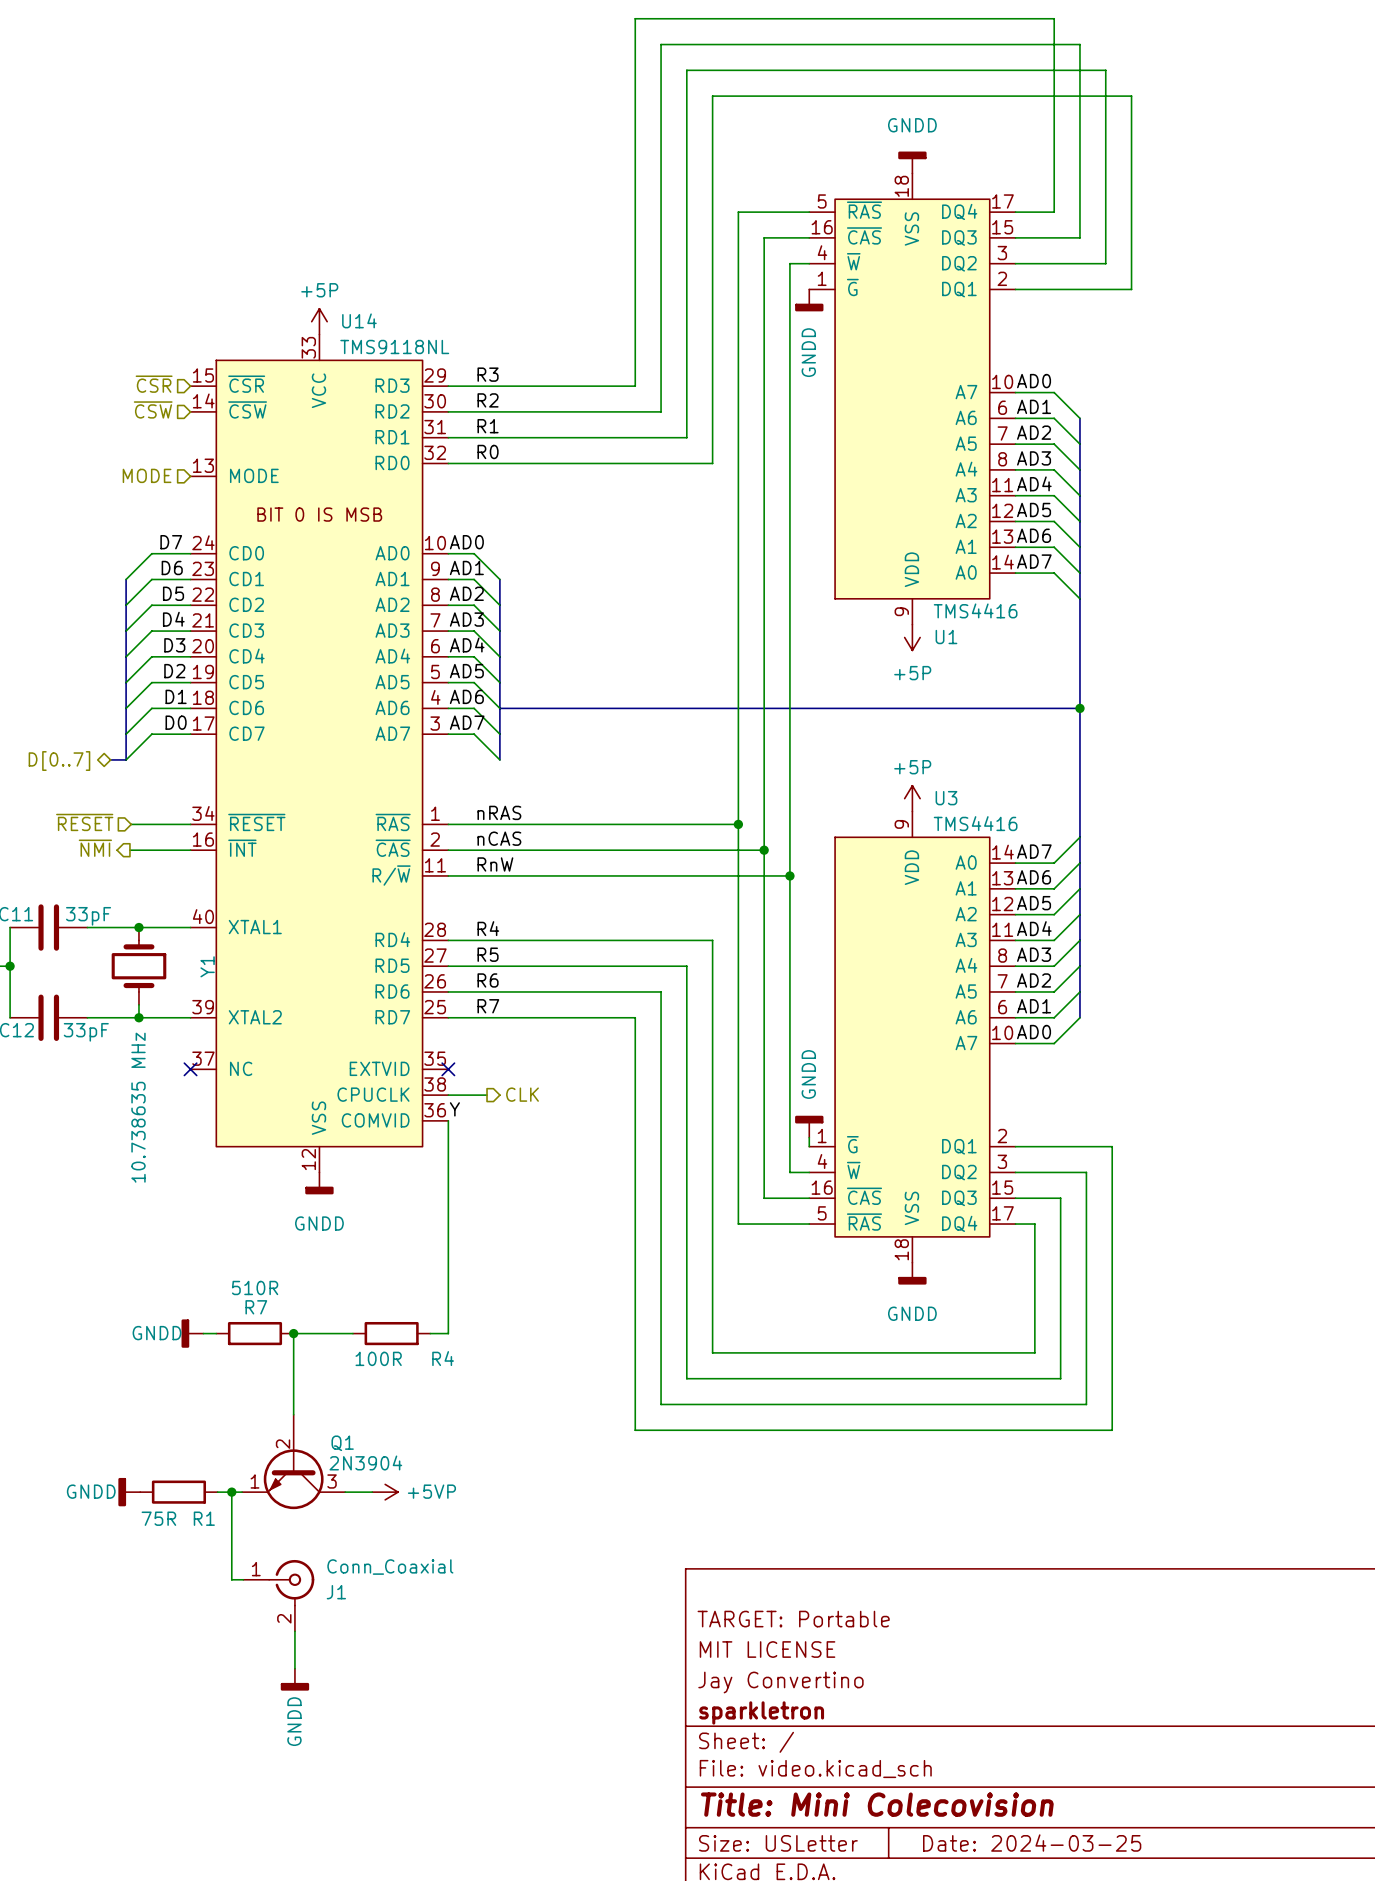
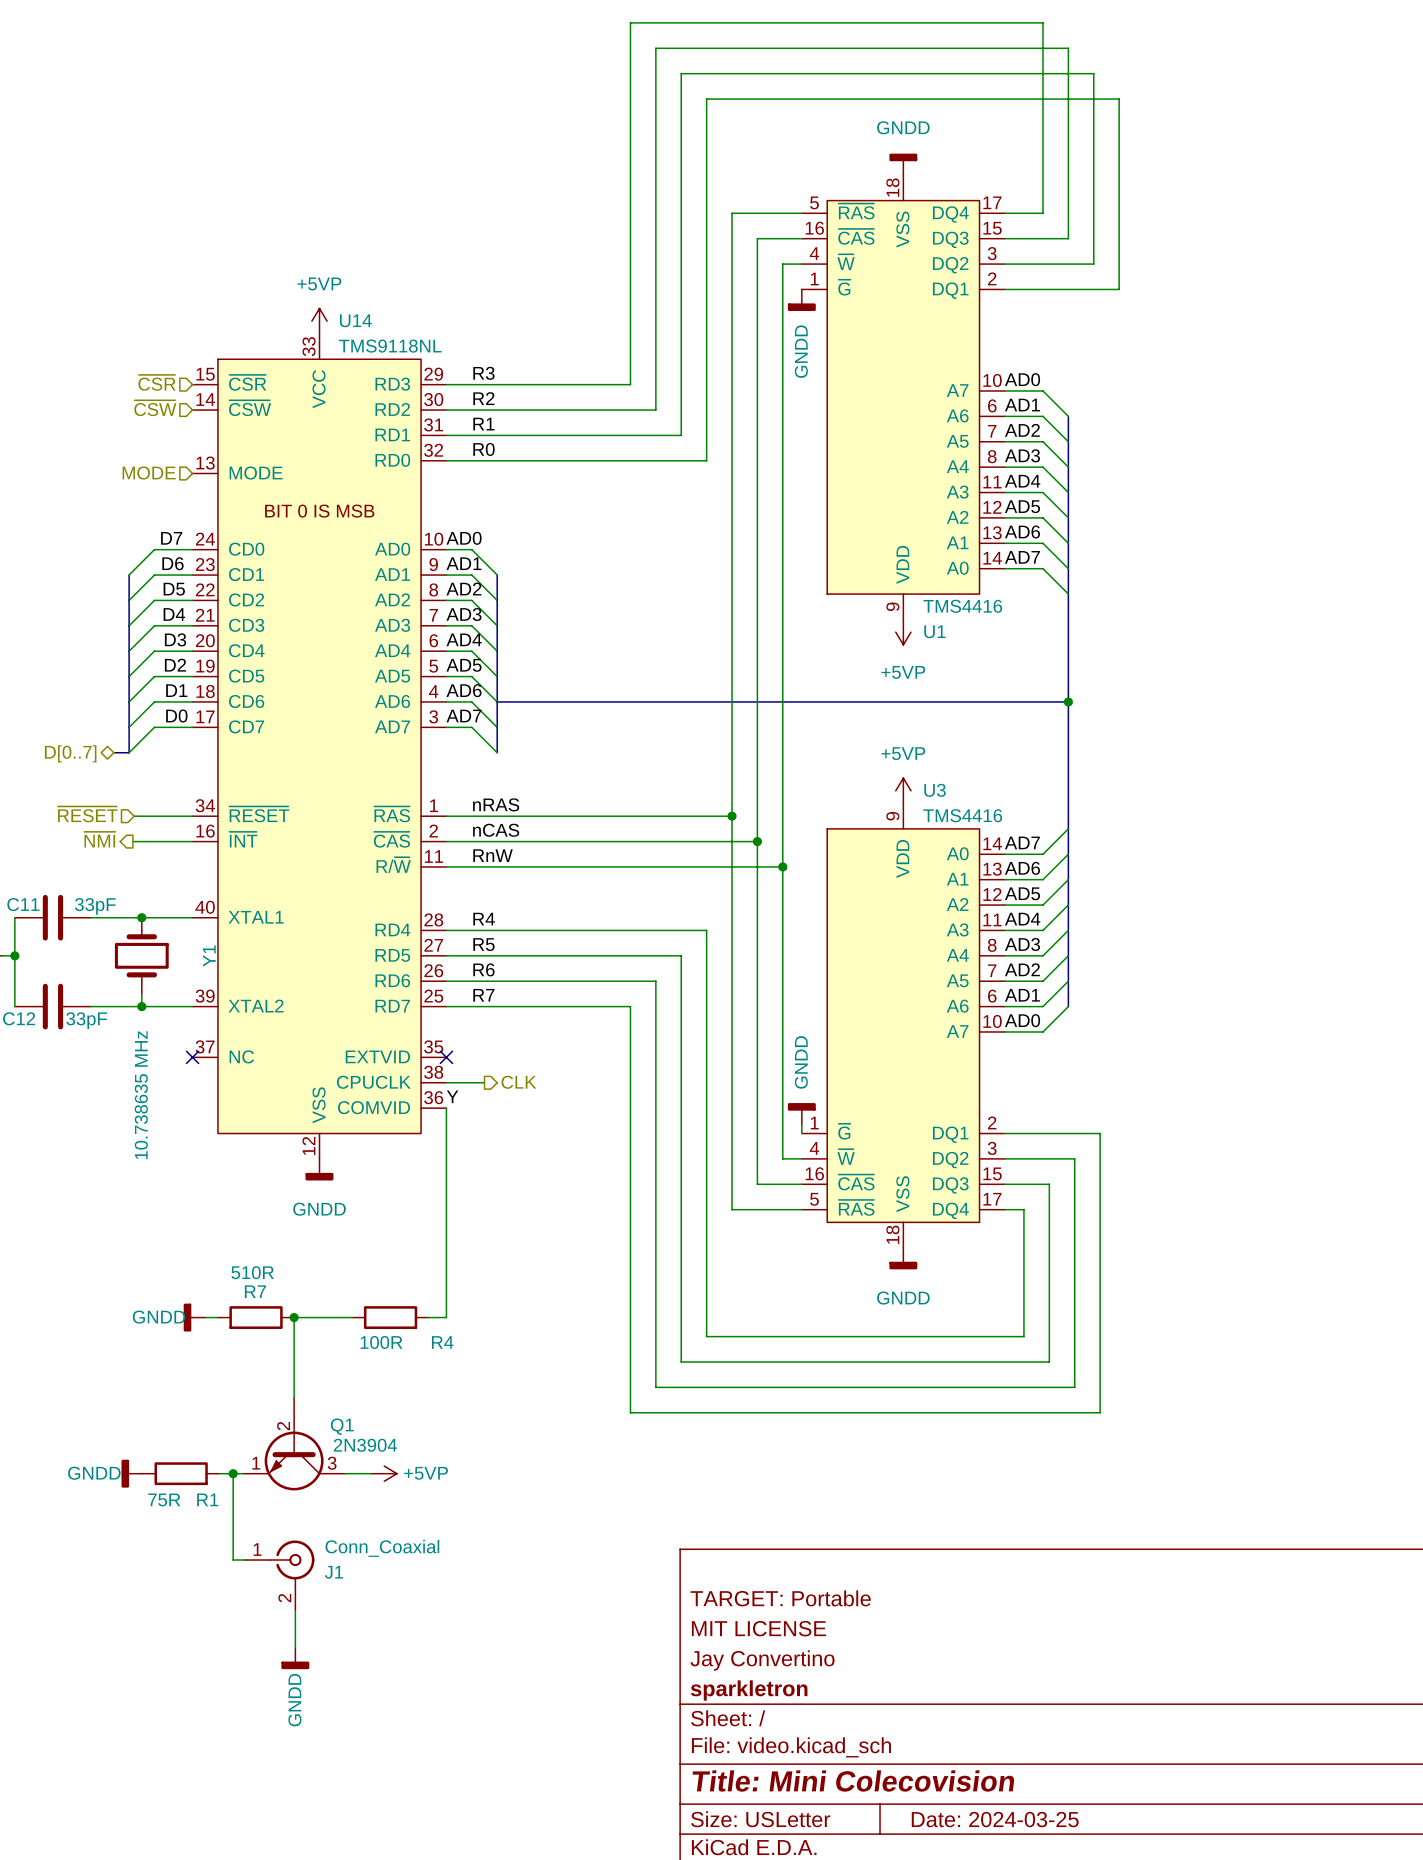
power symbol: +5P (319, 321) -> +5VP (319, 321)
power symbol: +5P (912, 637) -> +5VP (903, 632)
power symbol: +5P (912, 798) -> +5VP (903, 790)

